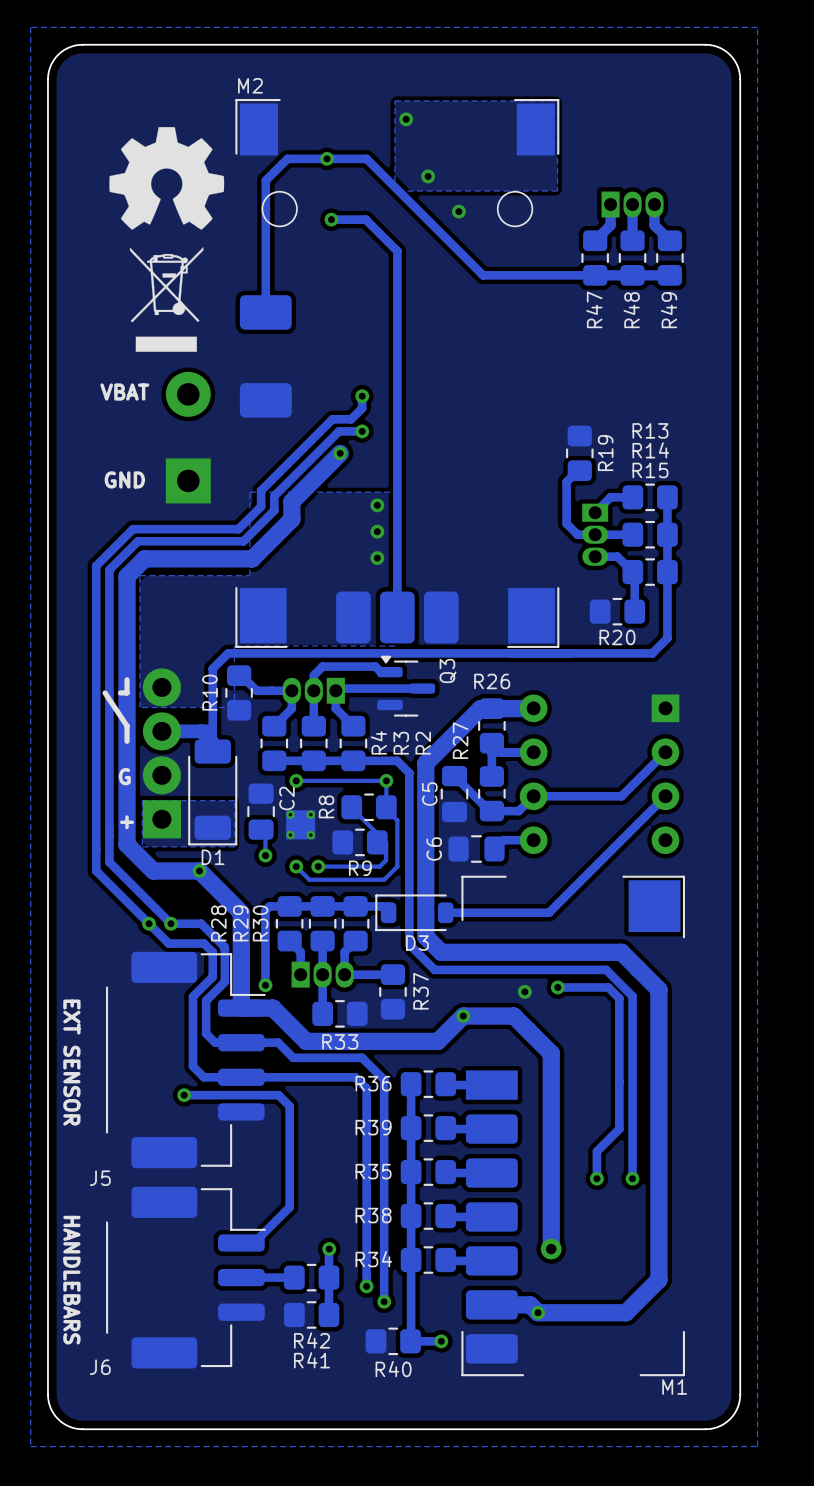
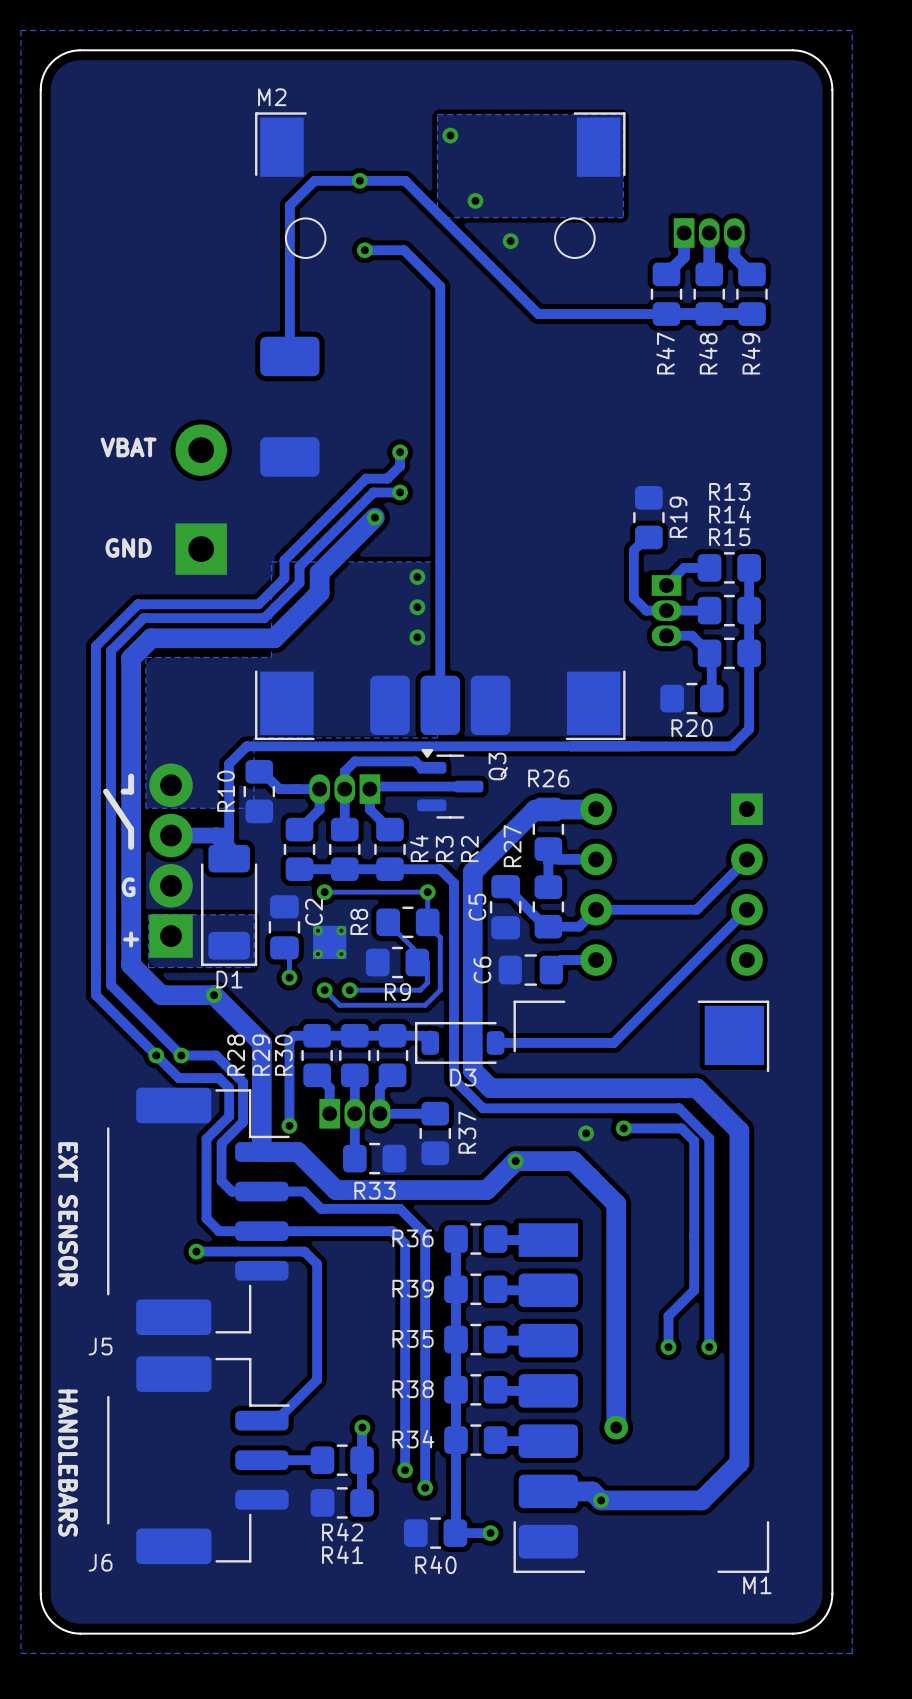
drawing: [109, 127, 225, 352] -> none

